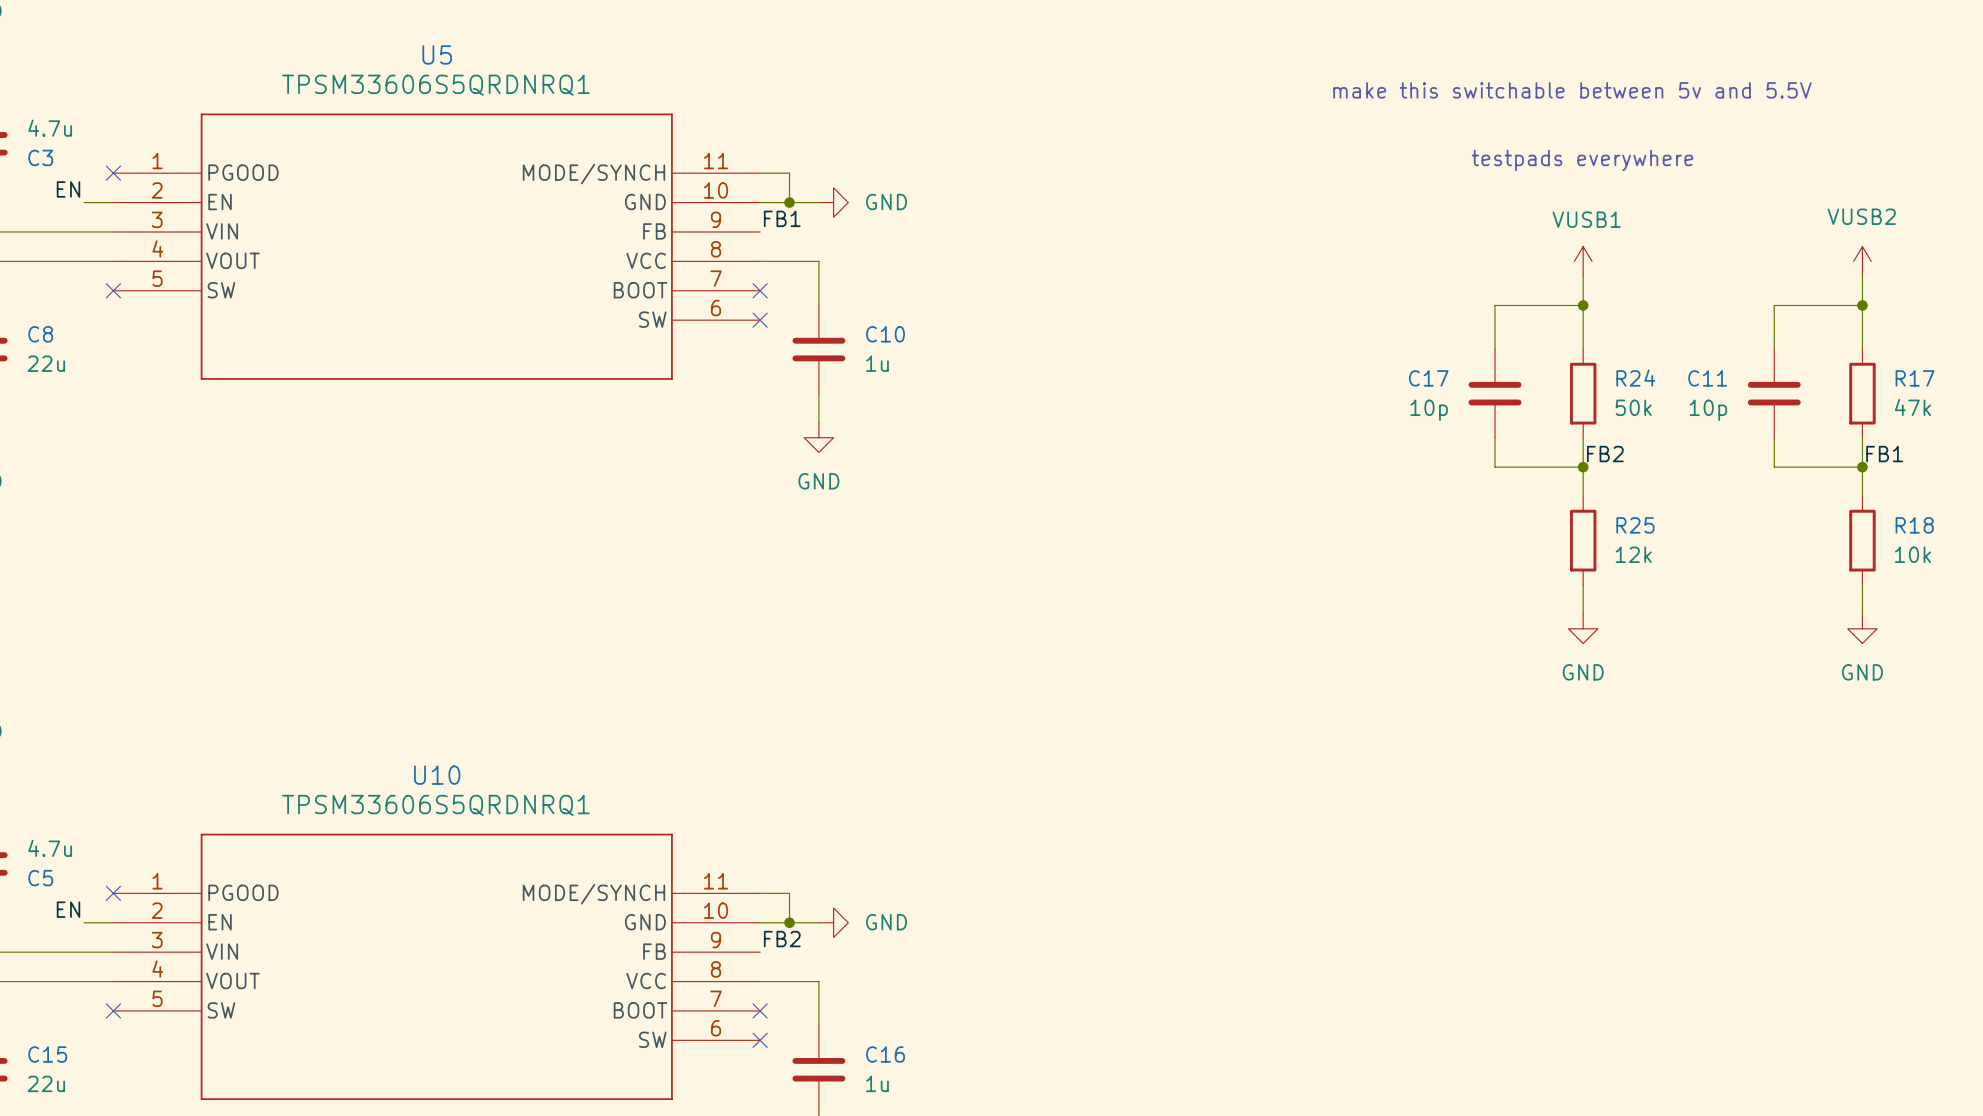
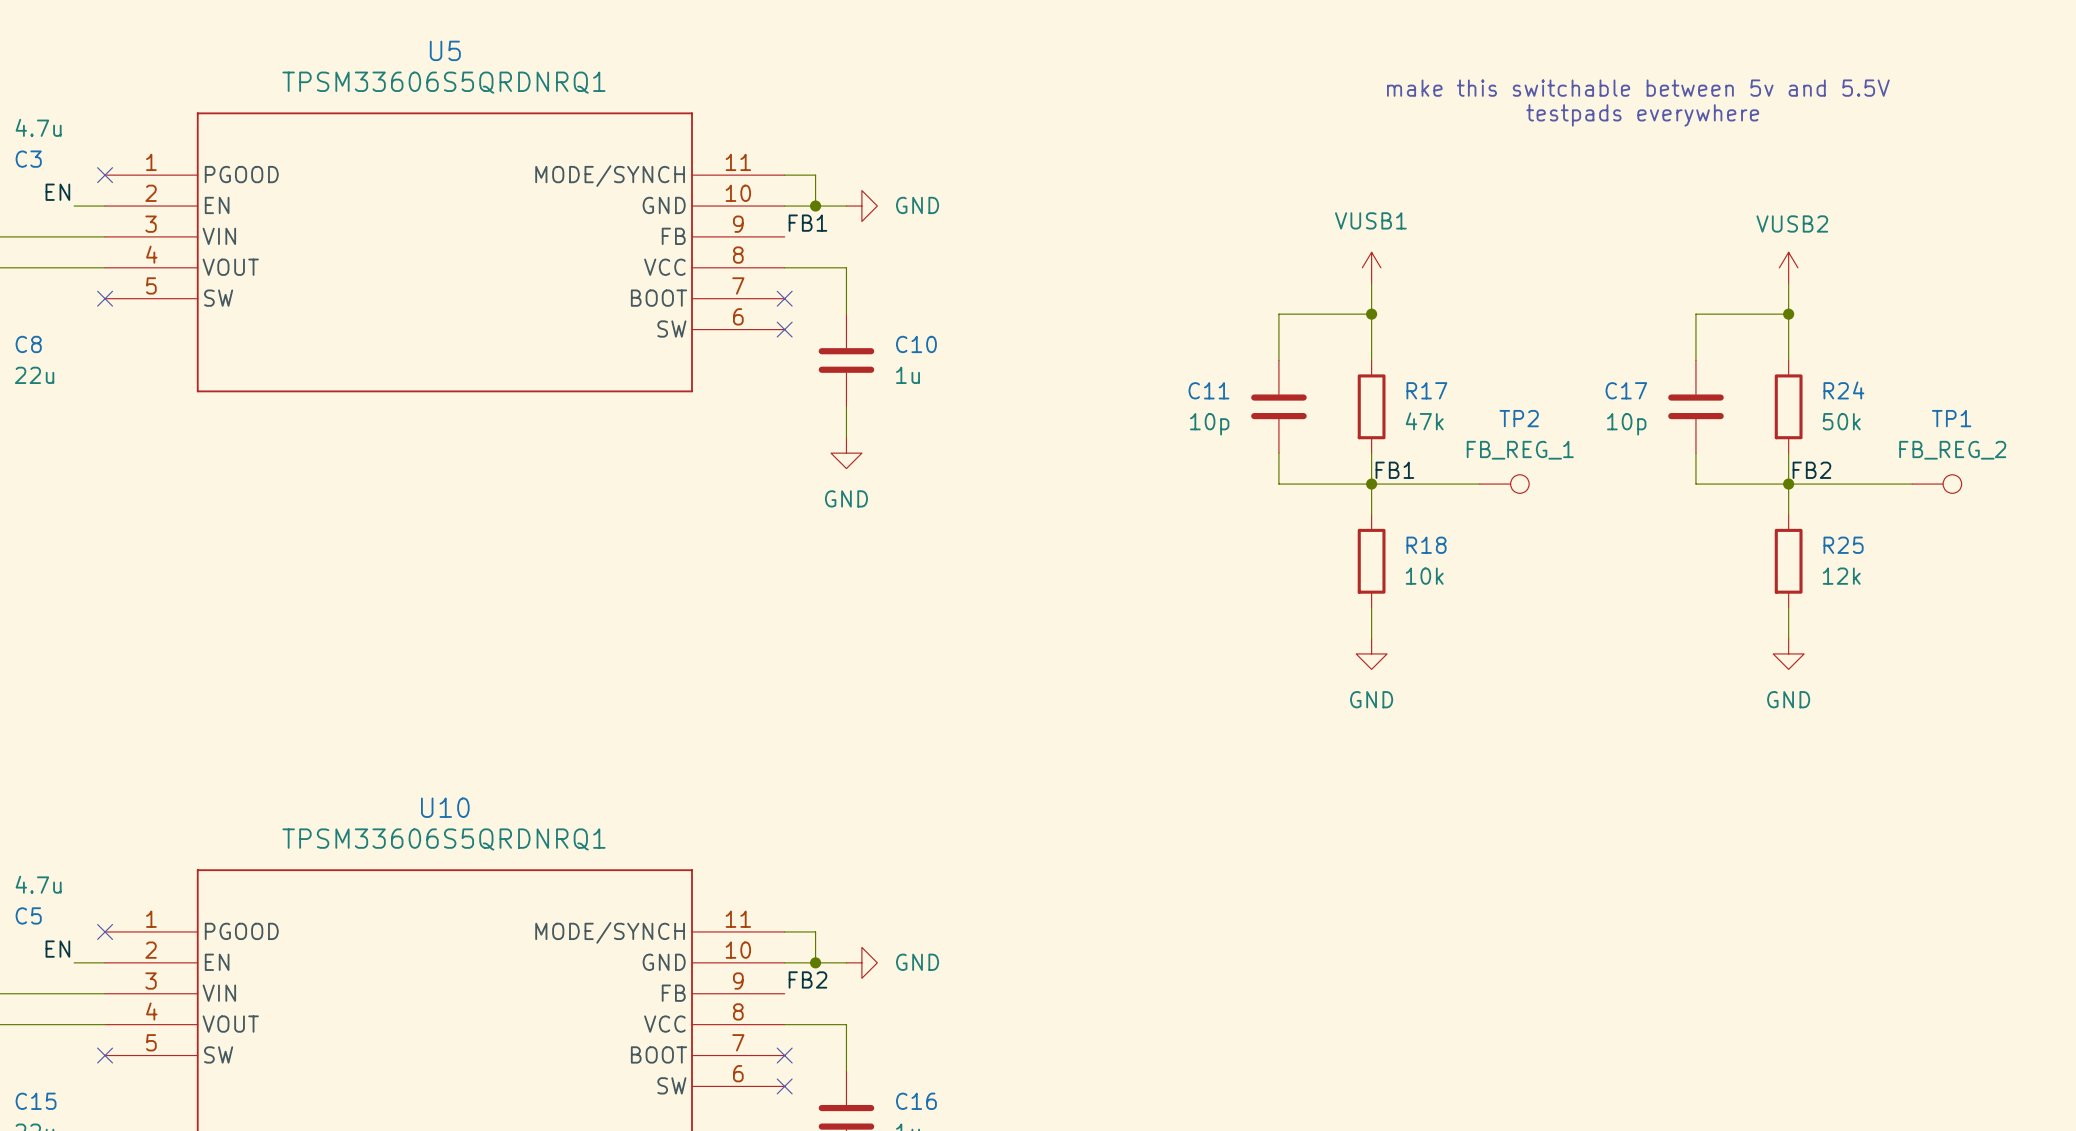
text position: testpads everywhere (1582, 160) -> testpads everywhere (1642, 115)
power symbol text position: VUSB2 (1861, 216) -> VUSB2 (1792, 223)
power symbol text position: VUSB1 (1586, 219) -> VUSB1 (1370, 220)
power symbol position: VUSB1 (1583, 261) -> VUSB1 (1371, 267)
power symbol position: VUSB2 (1862, 261) -> VUSB2 (1788, 267)
wire: none -> (1371, 283) (1371, 360)
wire: (1583, 276) (1583, 349) -> (1788, 283) (1788, 360)
wire: (1862, 276) (1862, 349) -> none
wire: none -> (1371, 314) (1278, 314) (1278, 360)
junction: none -> (1371, 314)
wire: (1583, 305) (1495, 305) (1495, 349) -> (1788, 314) (1695, 314) (1695, 360)
junction: (1583, 305) -> none
junction: none -> (1788, 314)
wire: (1862, 305) (1774, 305) (1774, 349) -> none
junction: (1862, 305) -> none
C17 position: (1495, 393) -> (1695, 406)
R24 position: (1583, 393) -> (1788, 406)
C11 position: (1774, 393) -> (1278, 406)
R17 position: (1862, 393) -> (1371, 406)
wire: none -> (1278, 453) (1278, 484) (1479, 484)
wire: none -> (1371, 453) (1371, 514)
wire: (1495, 437) (1495, 467) (1583, 467) -> none
wire: (1583, 437) (1583, 496) -> (1788, 453) (1788, 514)
wire: (1774, 437) (1774, 467) -> (1695, 453) (1695, 484) (1850, 484)
wire: (1862, 437) (1862, 496) -> none
label: none -> FB1 (1394, 470)
label position: FB2 (1605, 454) -> FB2 (1811, 470)
label: FB1 (1884, 454) -> none
junction: none -> (1371, 484)
TP2: none -> FB_REG_1 (1504, 484)
junction: (1583, 467) -> none
junction: none -> (1788, 484)
TP1: none -> FB_REG_2 (1936, 484)
junction: (1862, 467) -> none
R25 position: (1583, 540) -> (1788, 561)
R18 position: (1862, 540) -> (1371, 561)
wire: none -> (1371, 607) (1371, 638)
wire: (1583, 584) (1583, 614) -> (1788, 607) (1788, 638)
wire: (1862, 584) (1862, 614) -> none
power symbol: none -> GND (1371, 653)
power symbol: GND (1583, 628) -> none
power symbol: none -> GND (1788, 653)
power symbol: GND (1862, 628) -> none

